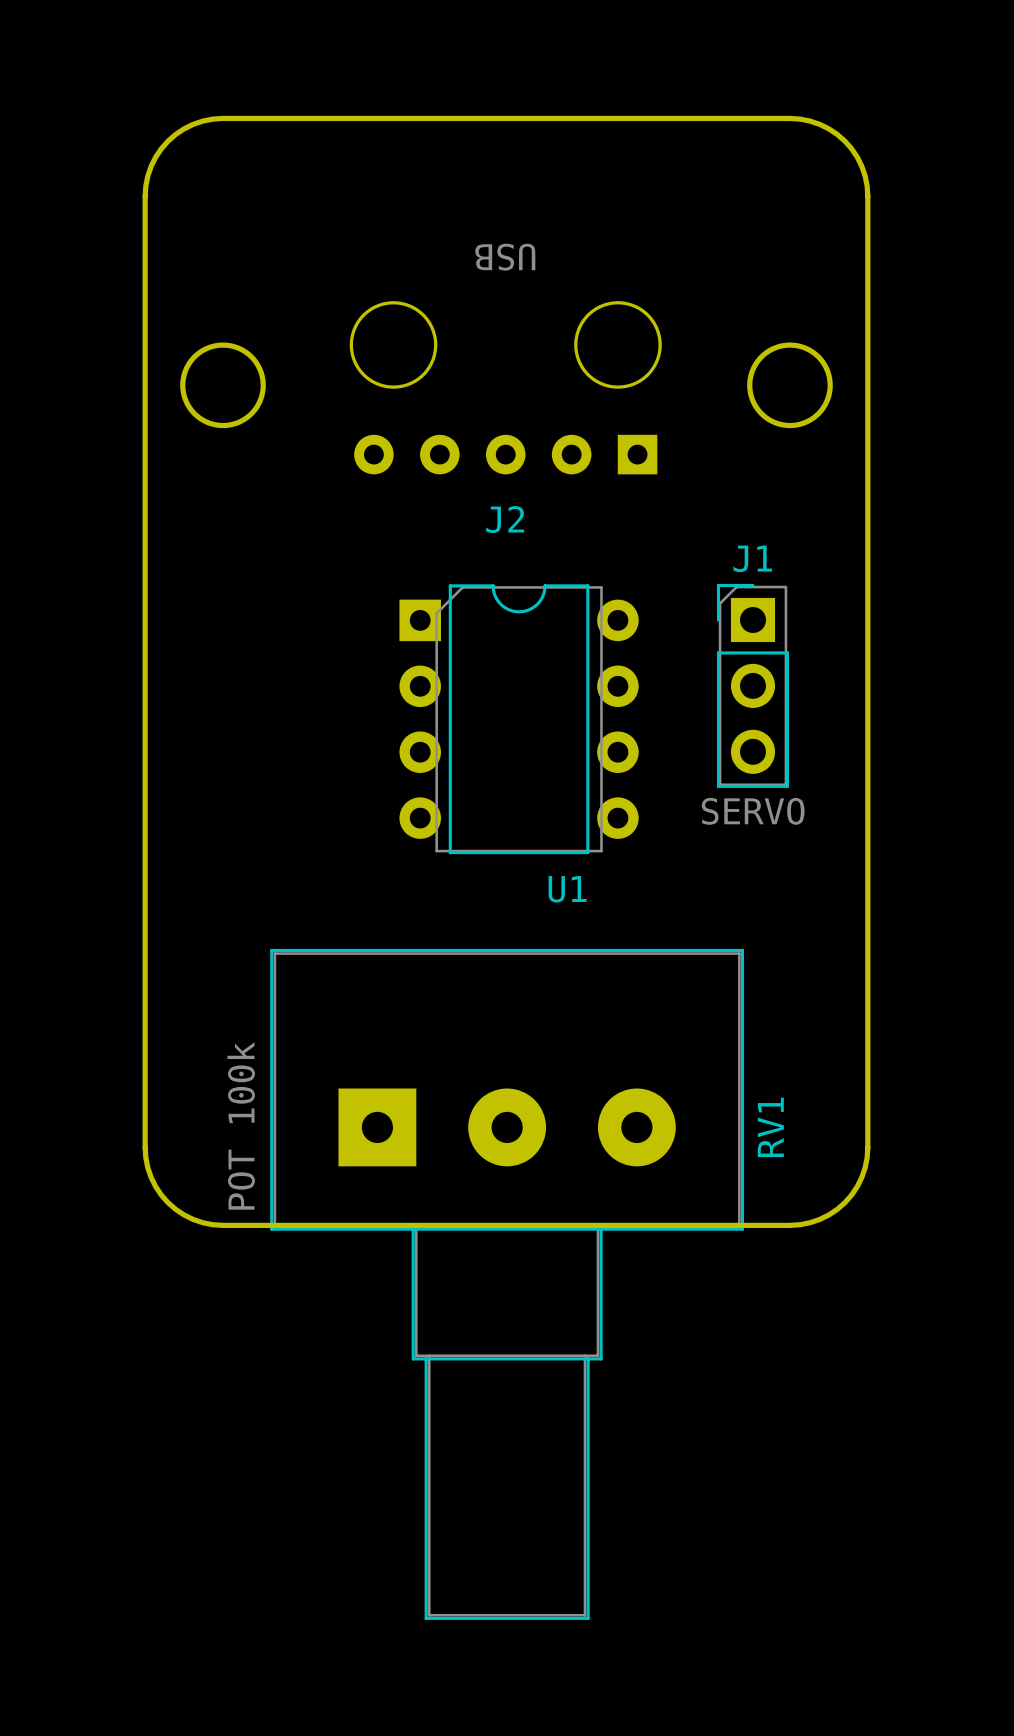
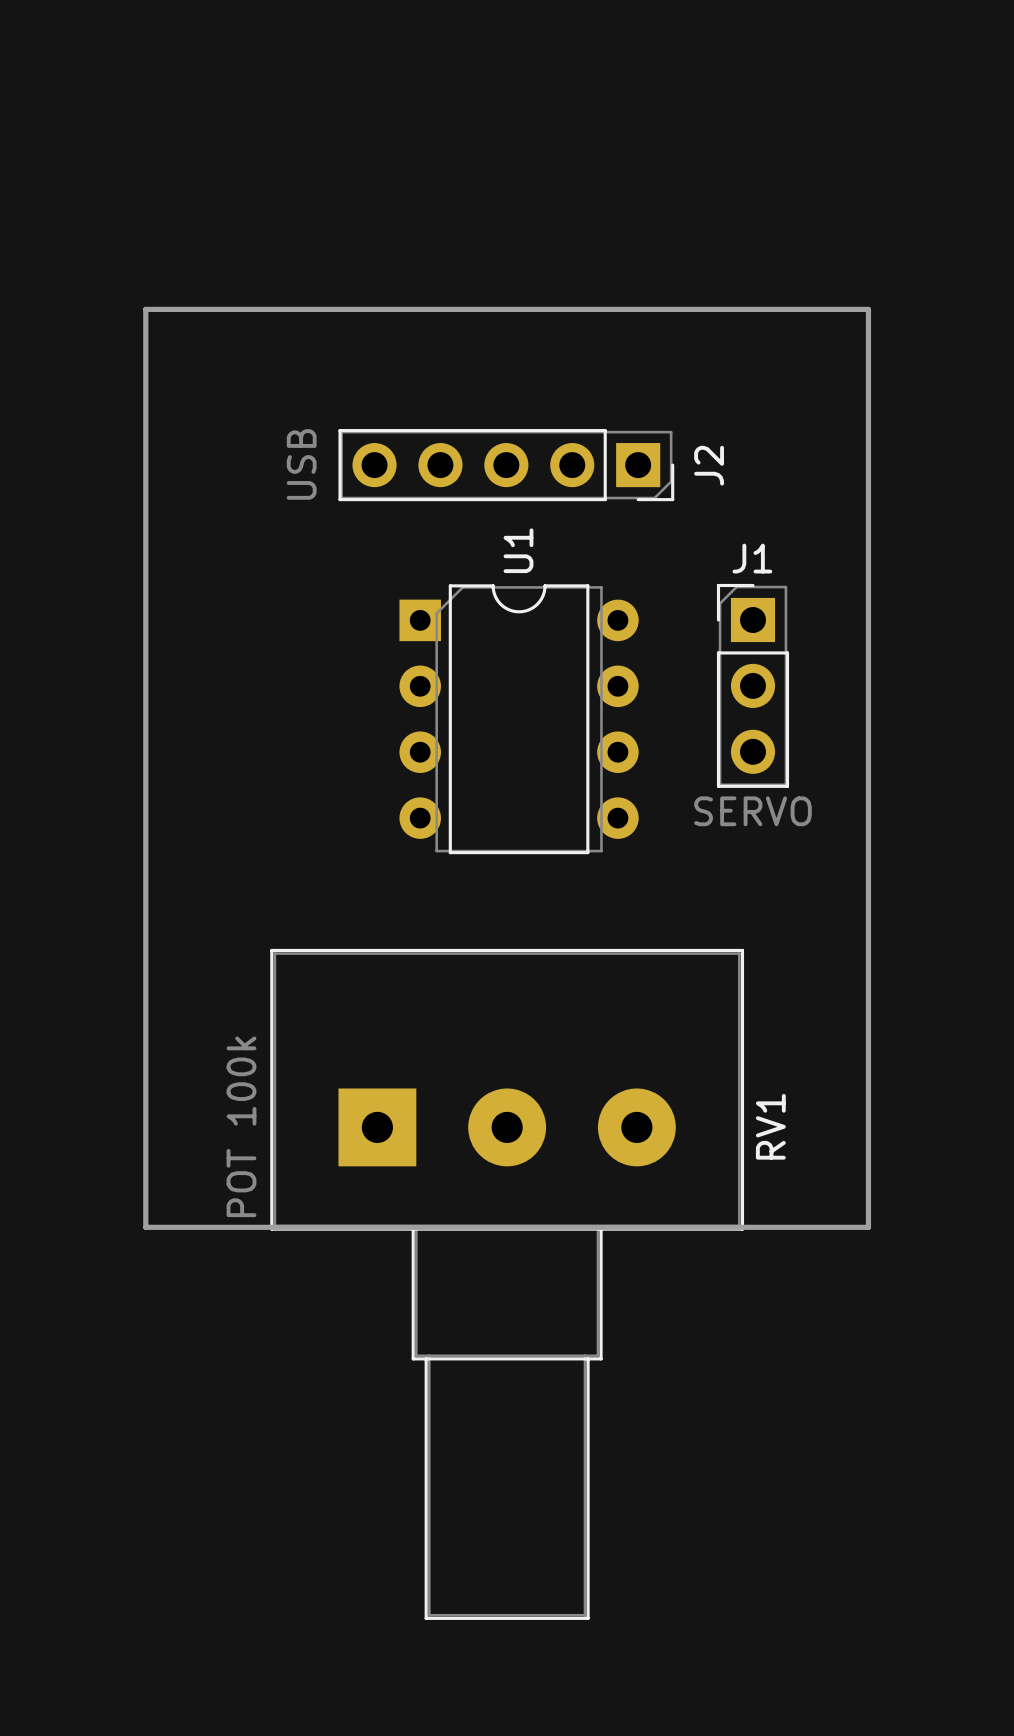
board edge: (223, 118) (789, 118) (810, 121) (828, 128) (845, 141) (857, 157) (865, 176) (867, 196) (867, 1147) (865, 1167) (857, 1186) (845, 1202) (828, 1214) (810, 1222) (789, 1225) (223, 1225) (202, 1222) (184, 1214) (167, 1202) (155, 1186) (147, 1167) (145, 1147) (145, 196) (151, 166) (167, 141) (193, 124) (223, 118) -> (145, 309) (145, 1227) (868, 1227) (868, 309) (145, 309)
J2 value position: USB (505, 257) -> USB (301, 464)
J2 footprint: [349, 301, 662, 475] -> [338, 429, 675, 502]
round board edge: [180, 342, 266, 429] -> none
round board edge: [747, 342, 833, 429] -> none
J2 name position: J2 (505, 519) -> J2 (709, 465)
U1 name rotation: 0° (567, 889) -> 90° counterclockwise (518, 550)
U1 name position: U1 (567, 889) -> U1 (518, 550)

